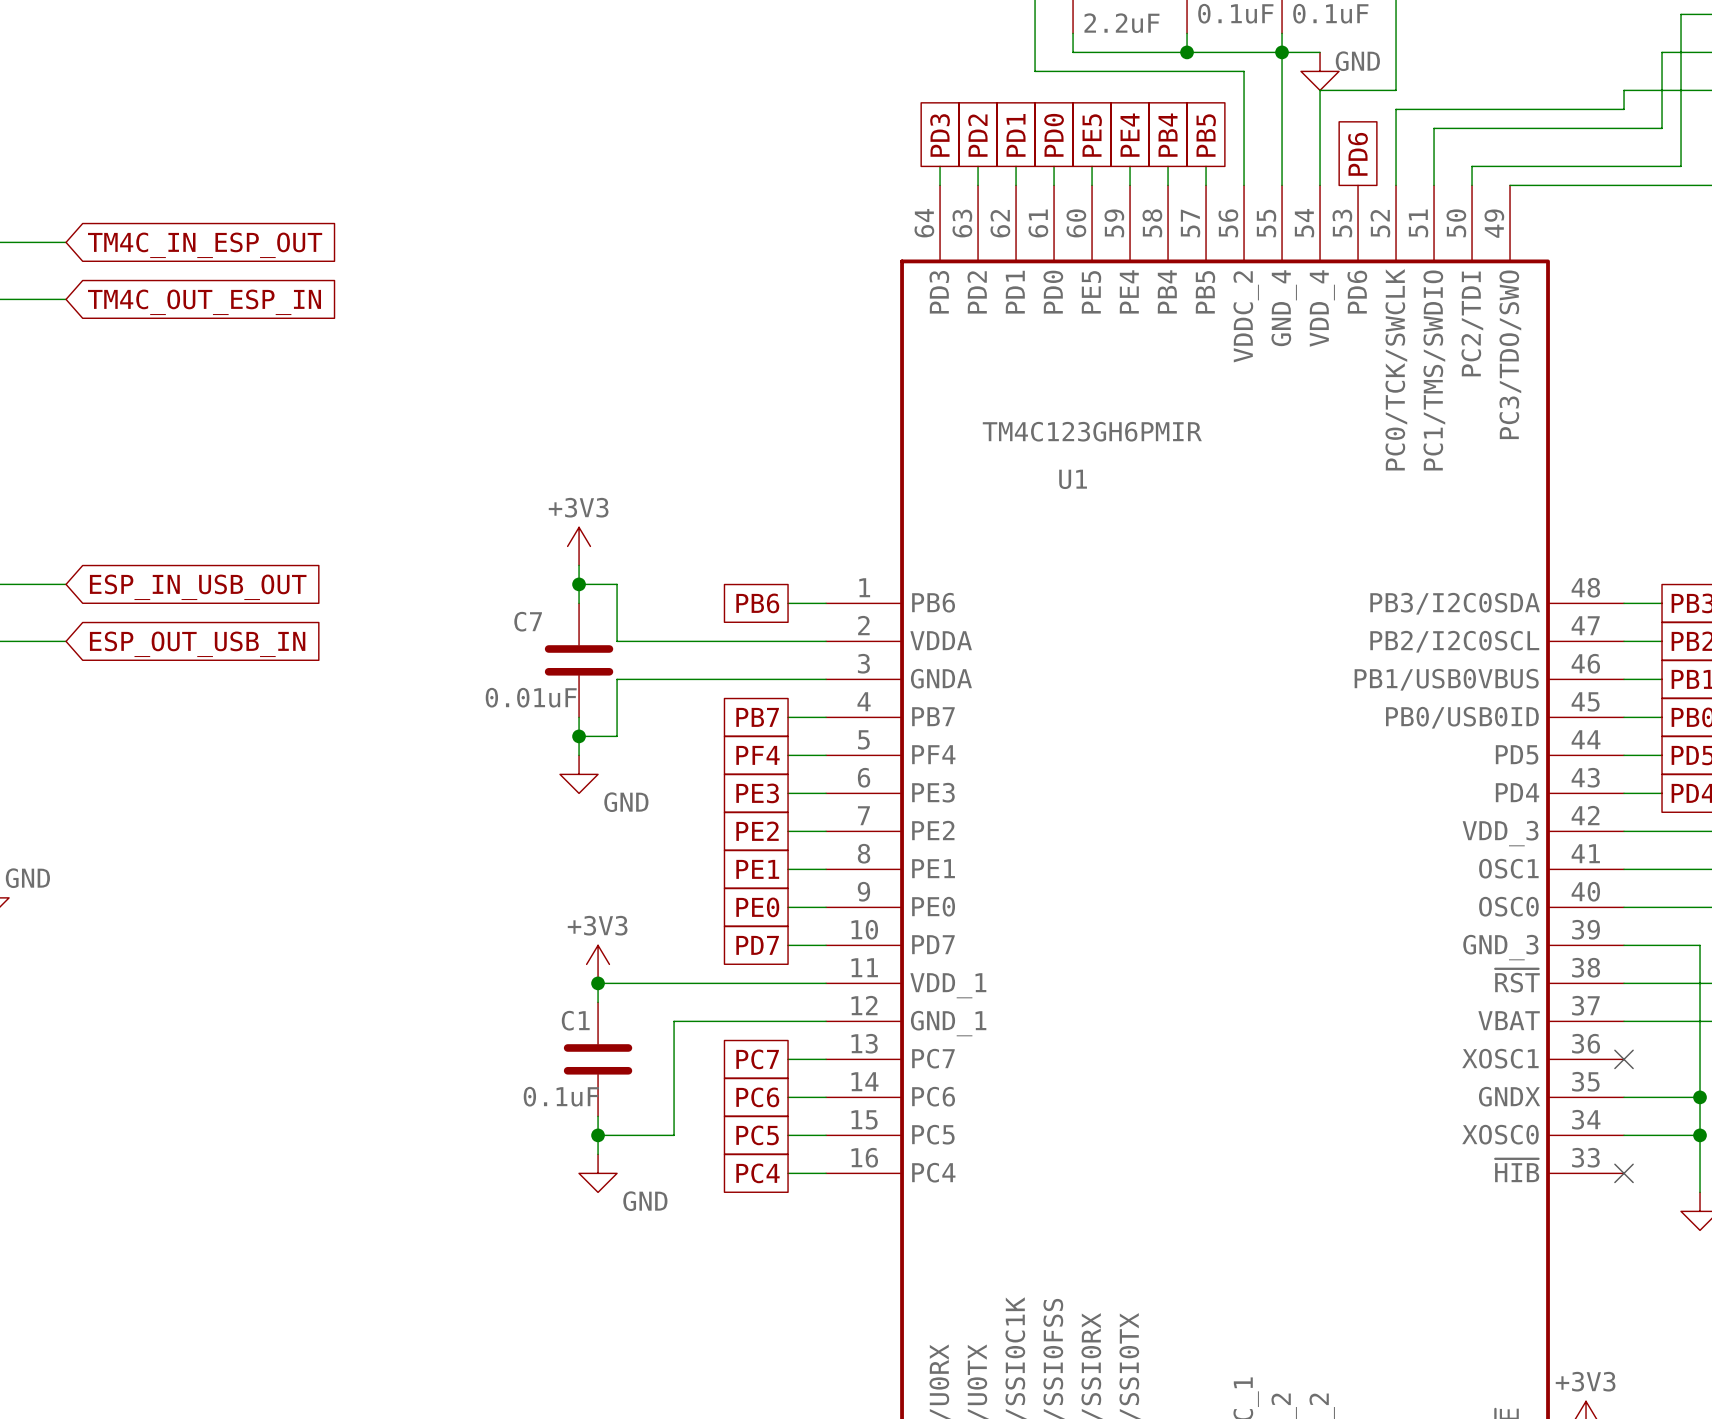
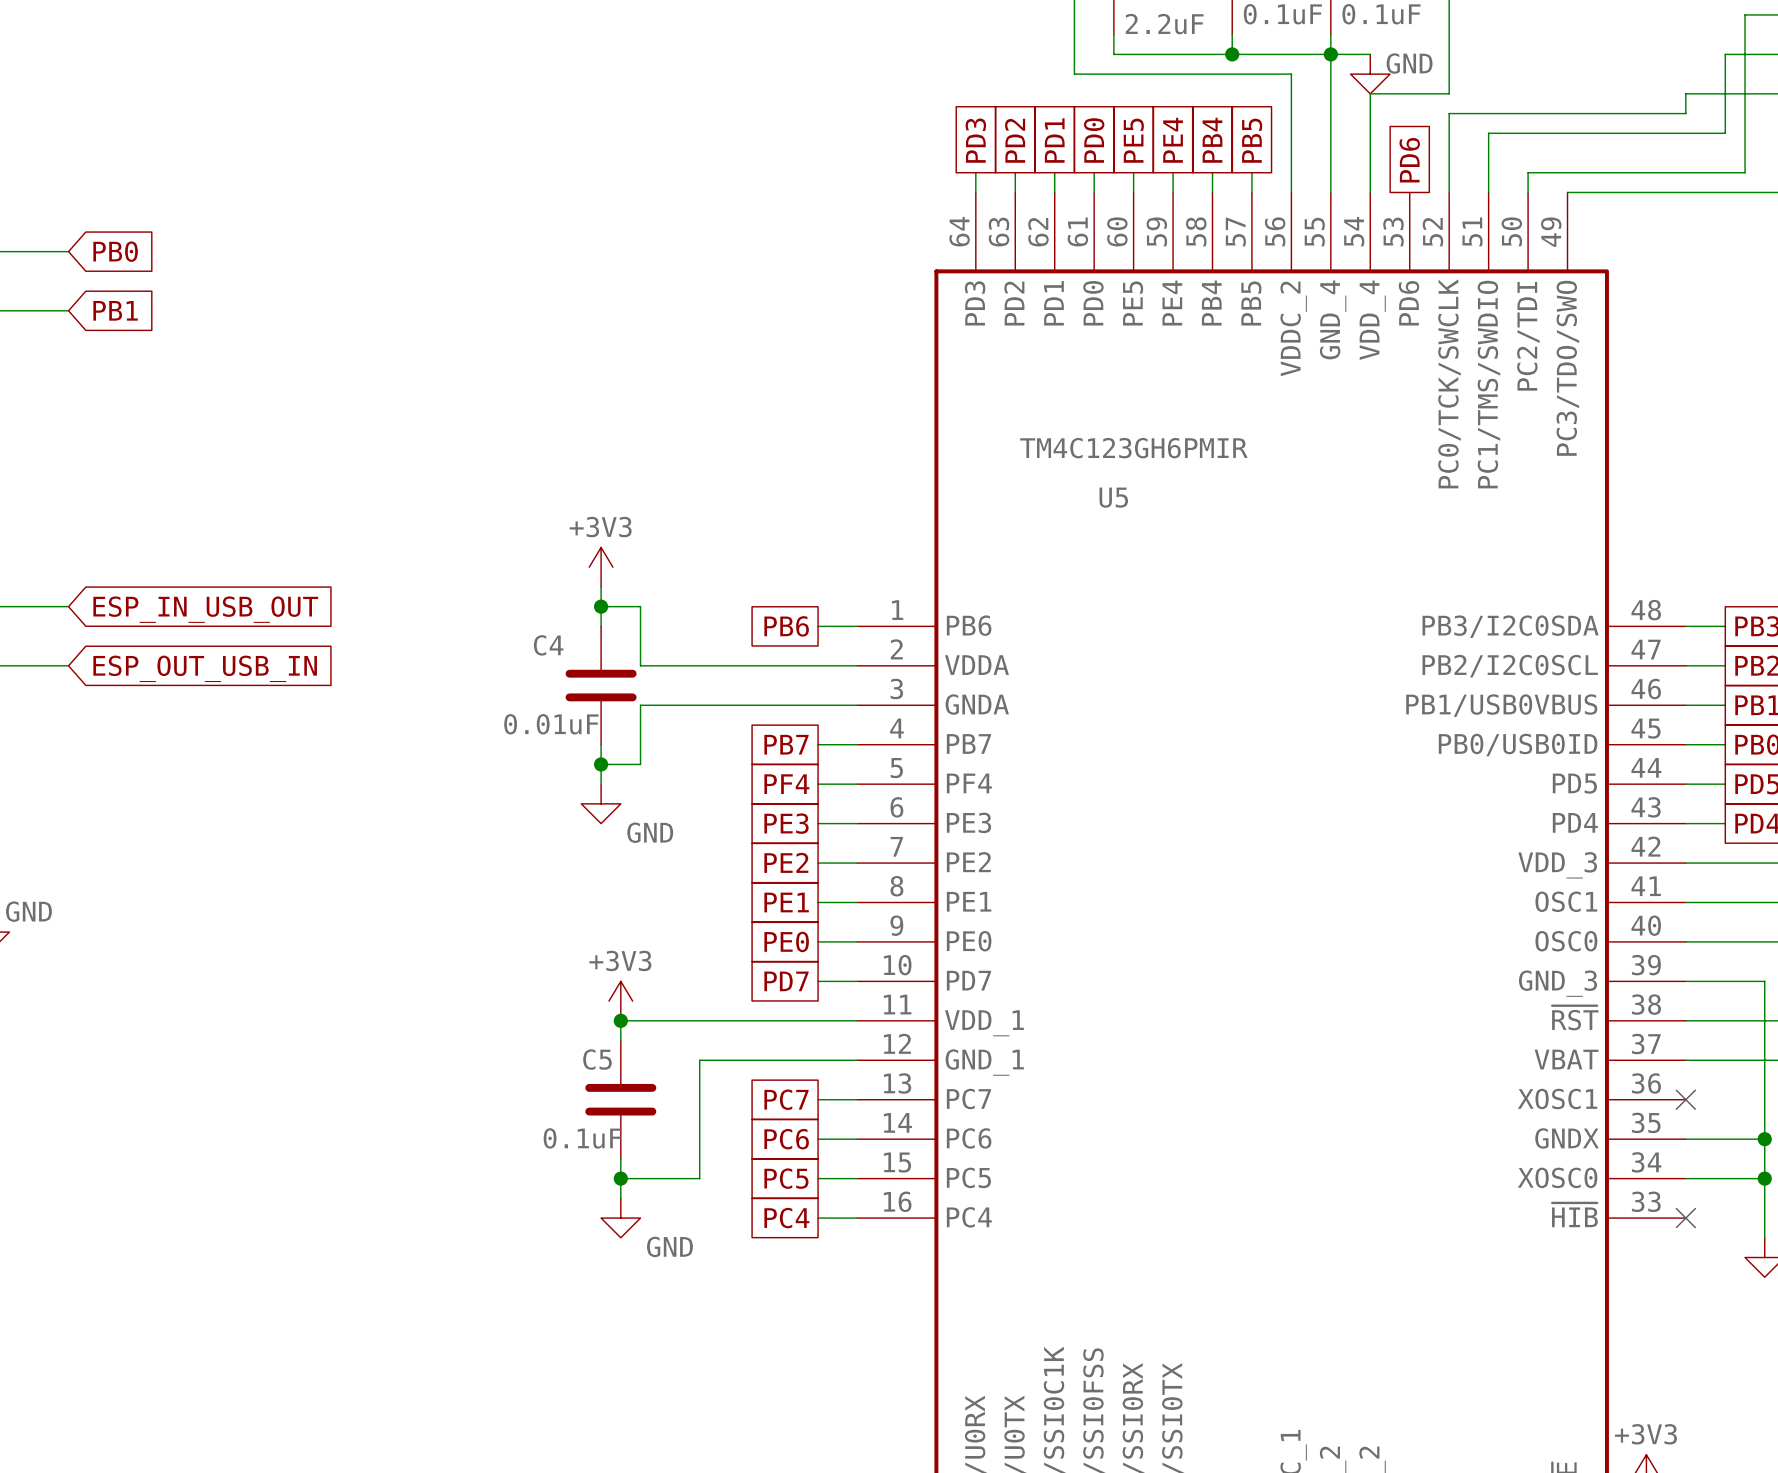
global label: TM4C_IN_ESP_OUT (205, 245) -> PB0 (115, 251)
global label: TM4C_OUT_ESP_IN (204, 302) -> PB1 (115, 310)
U1 name: U1 (1073, 479) -> U5 (1113, 497)
C7 name: C7 (528, 621) -> C4 (548, 645)
C1 name: C1 (575, 1020) -> C5 (597, 1059)

